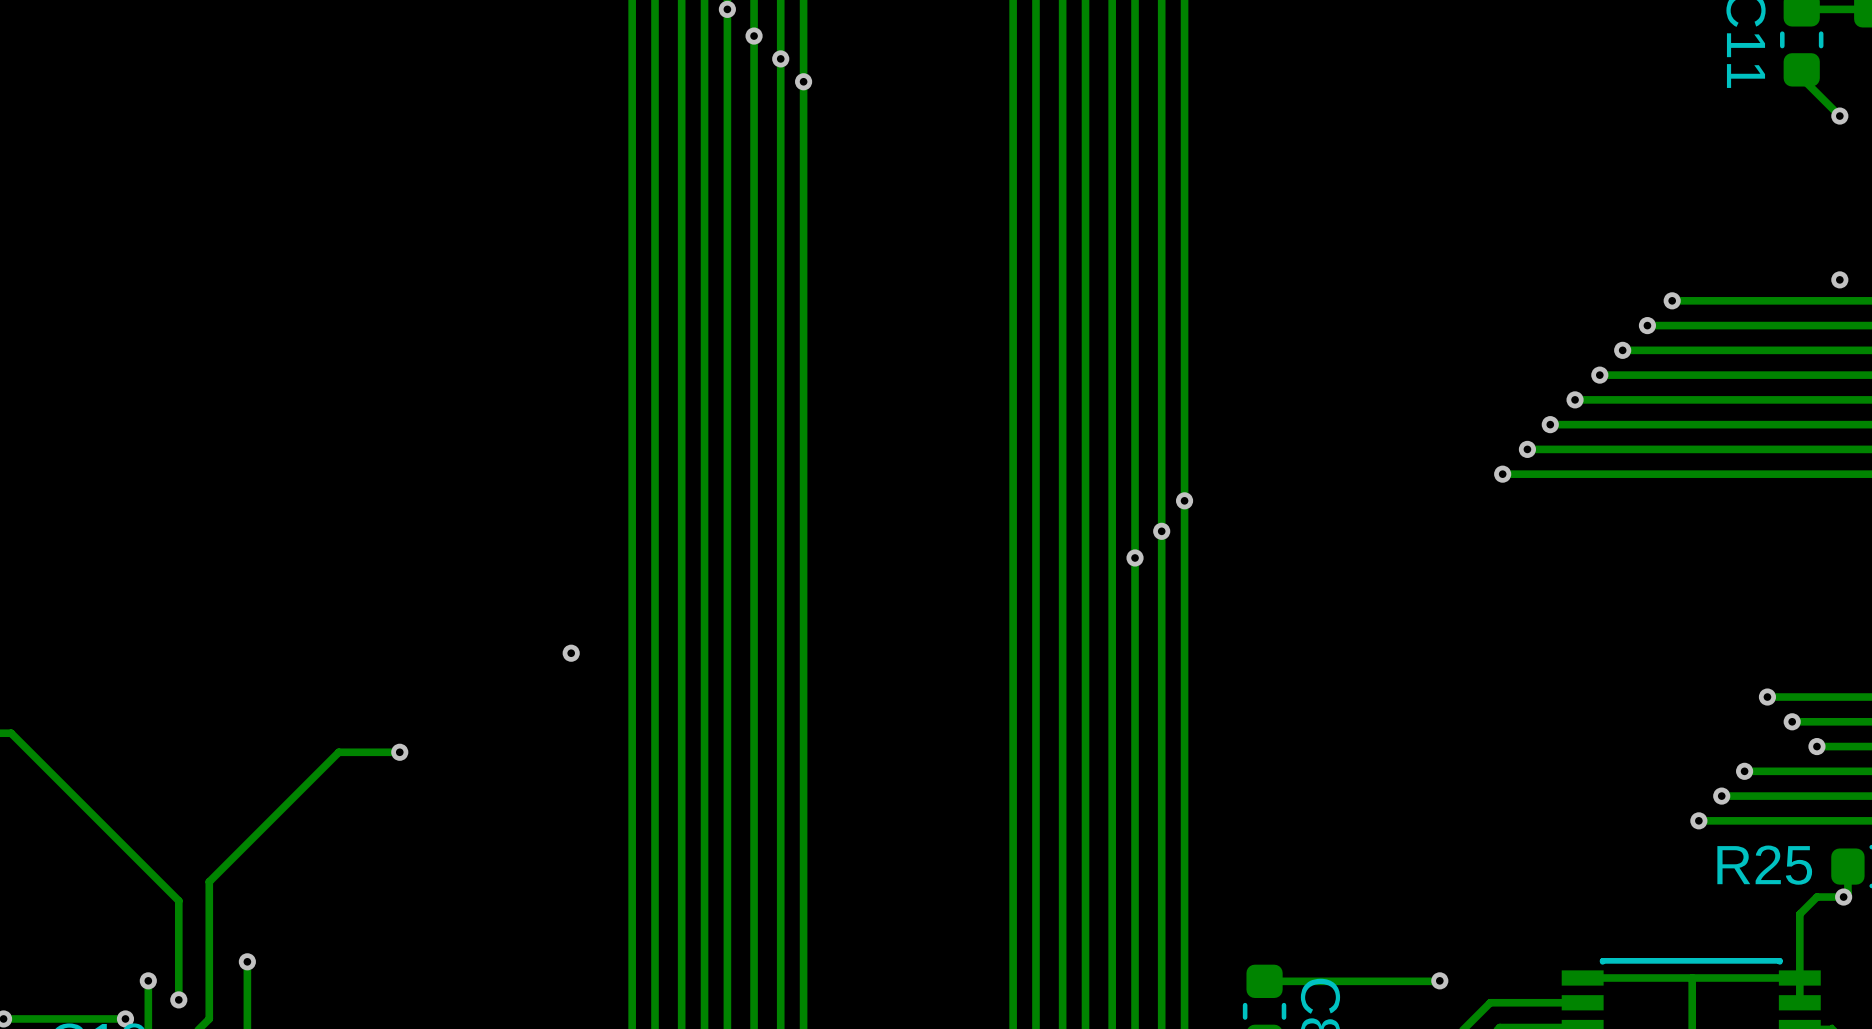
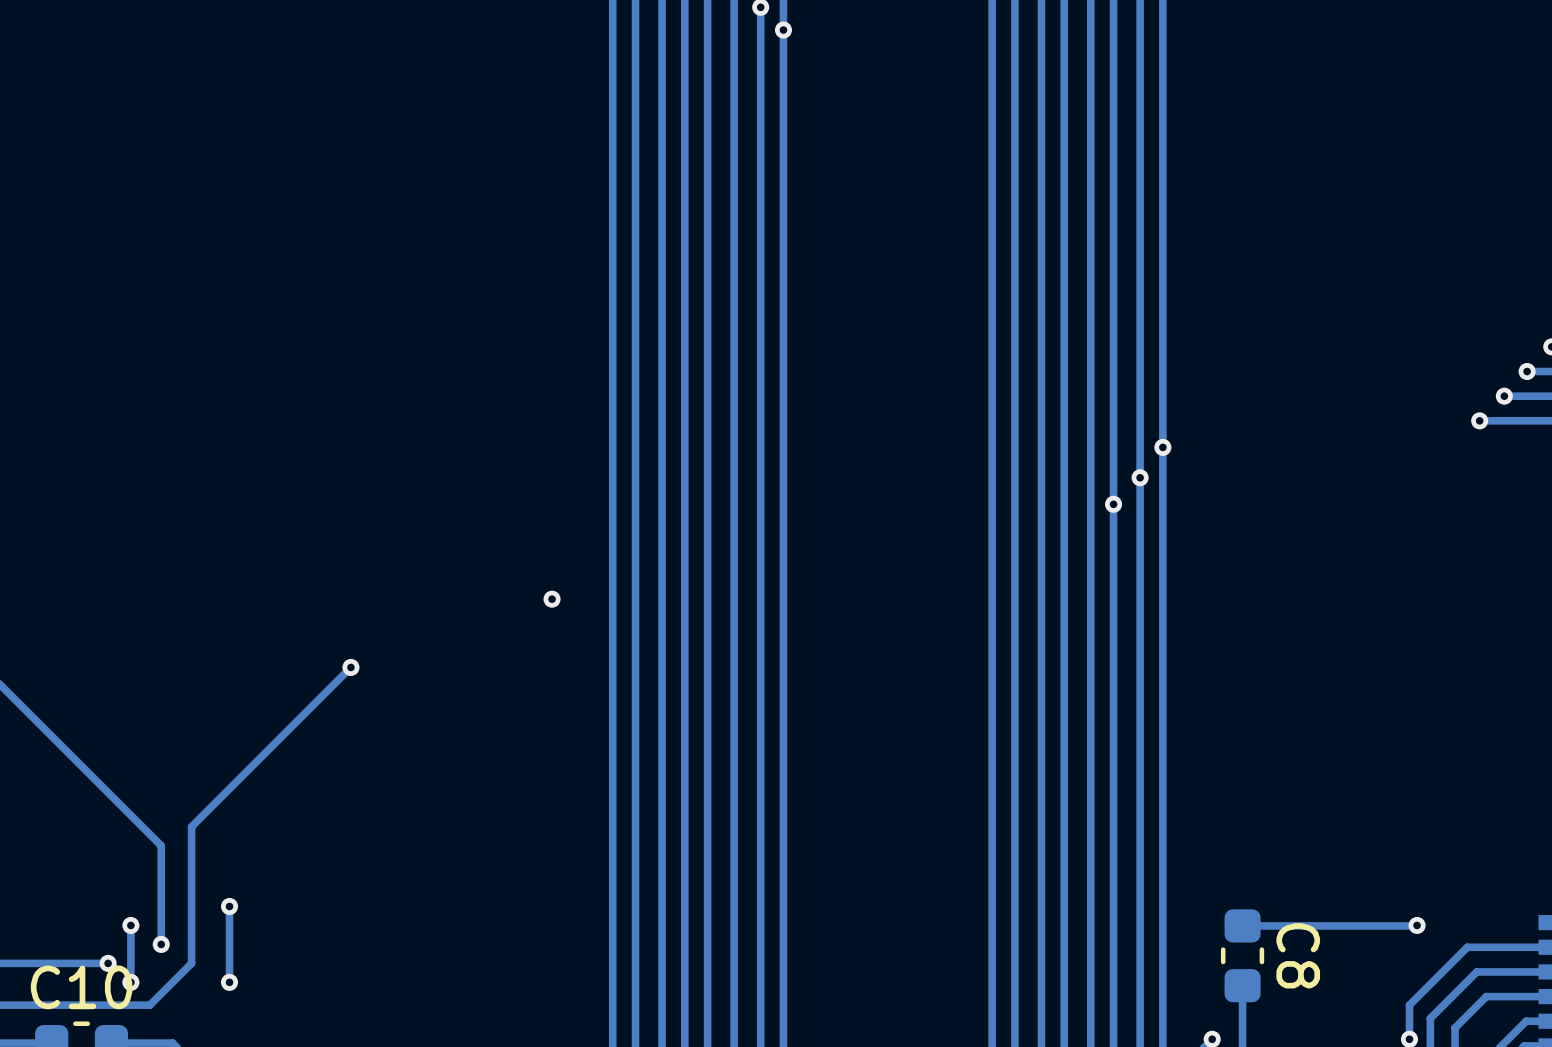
track: (399, 752) (338, 752) -> (350, 667) (320, 697)
via position: (399, 752) -> (350, 667)

